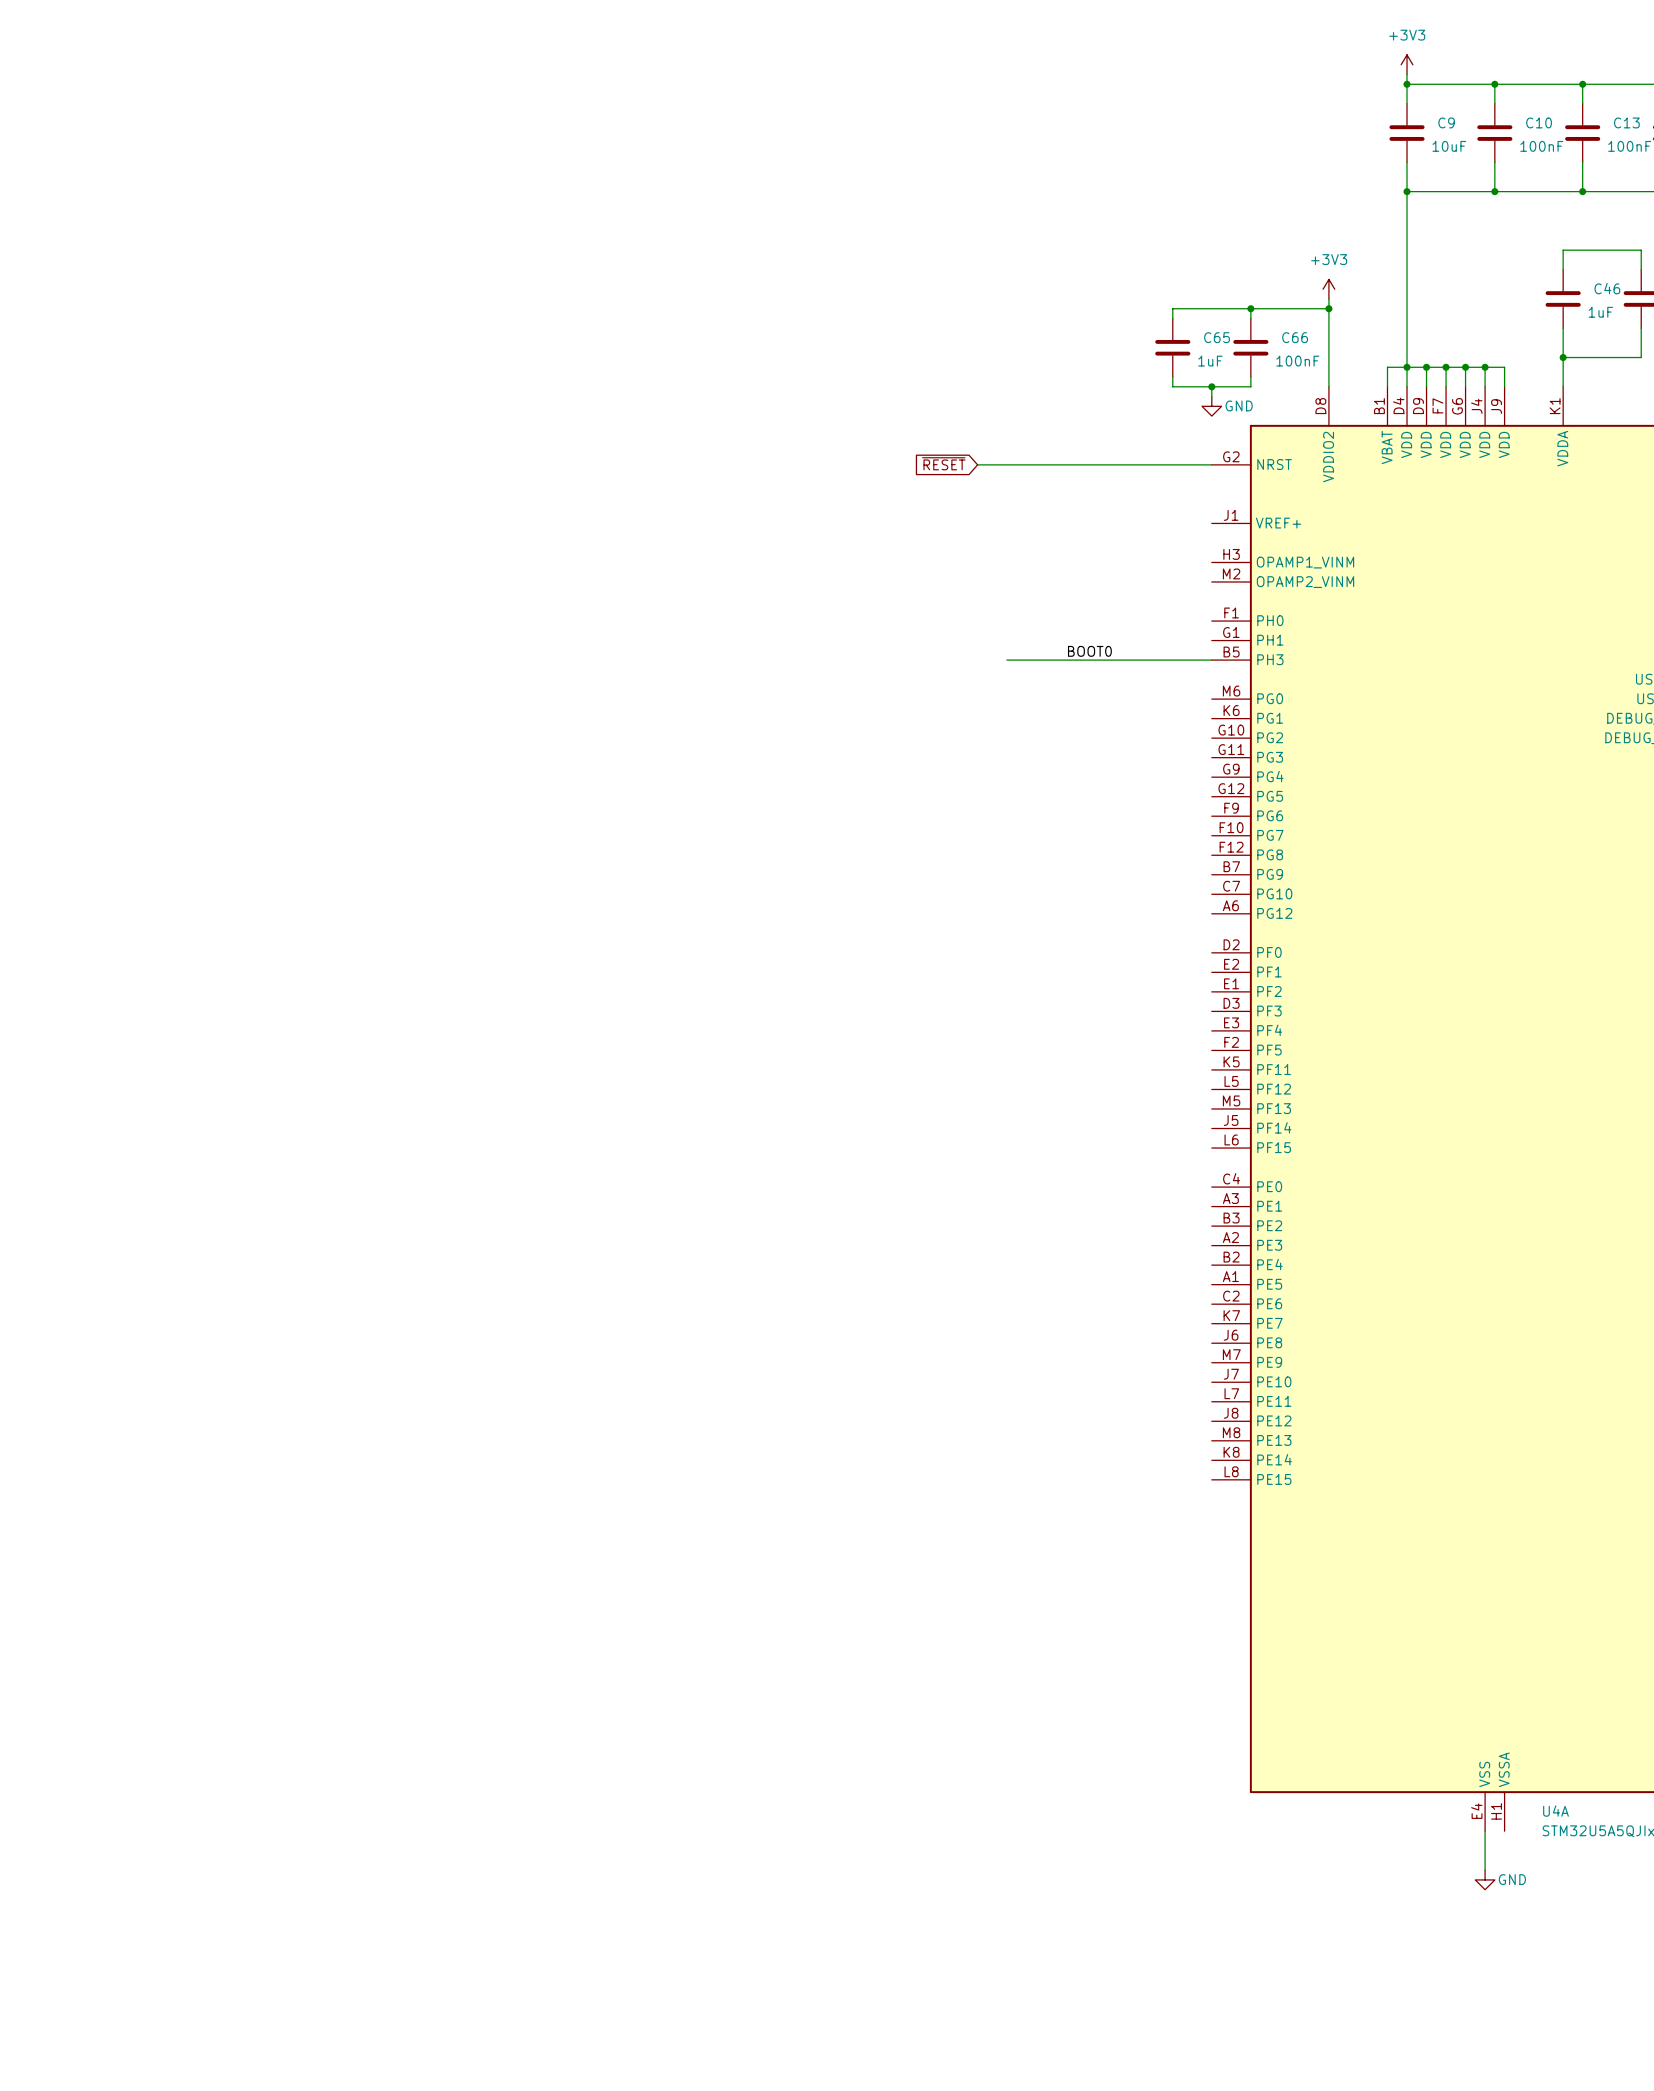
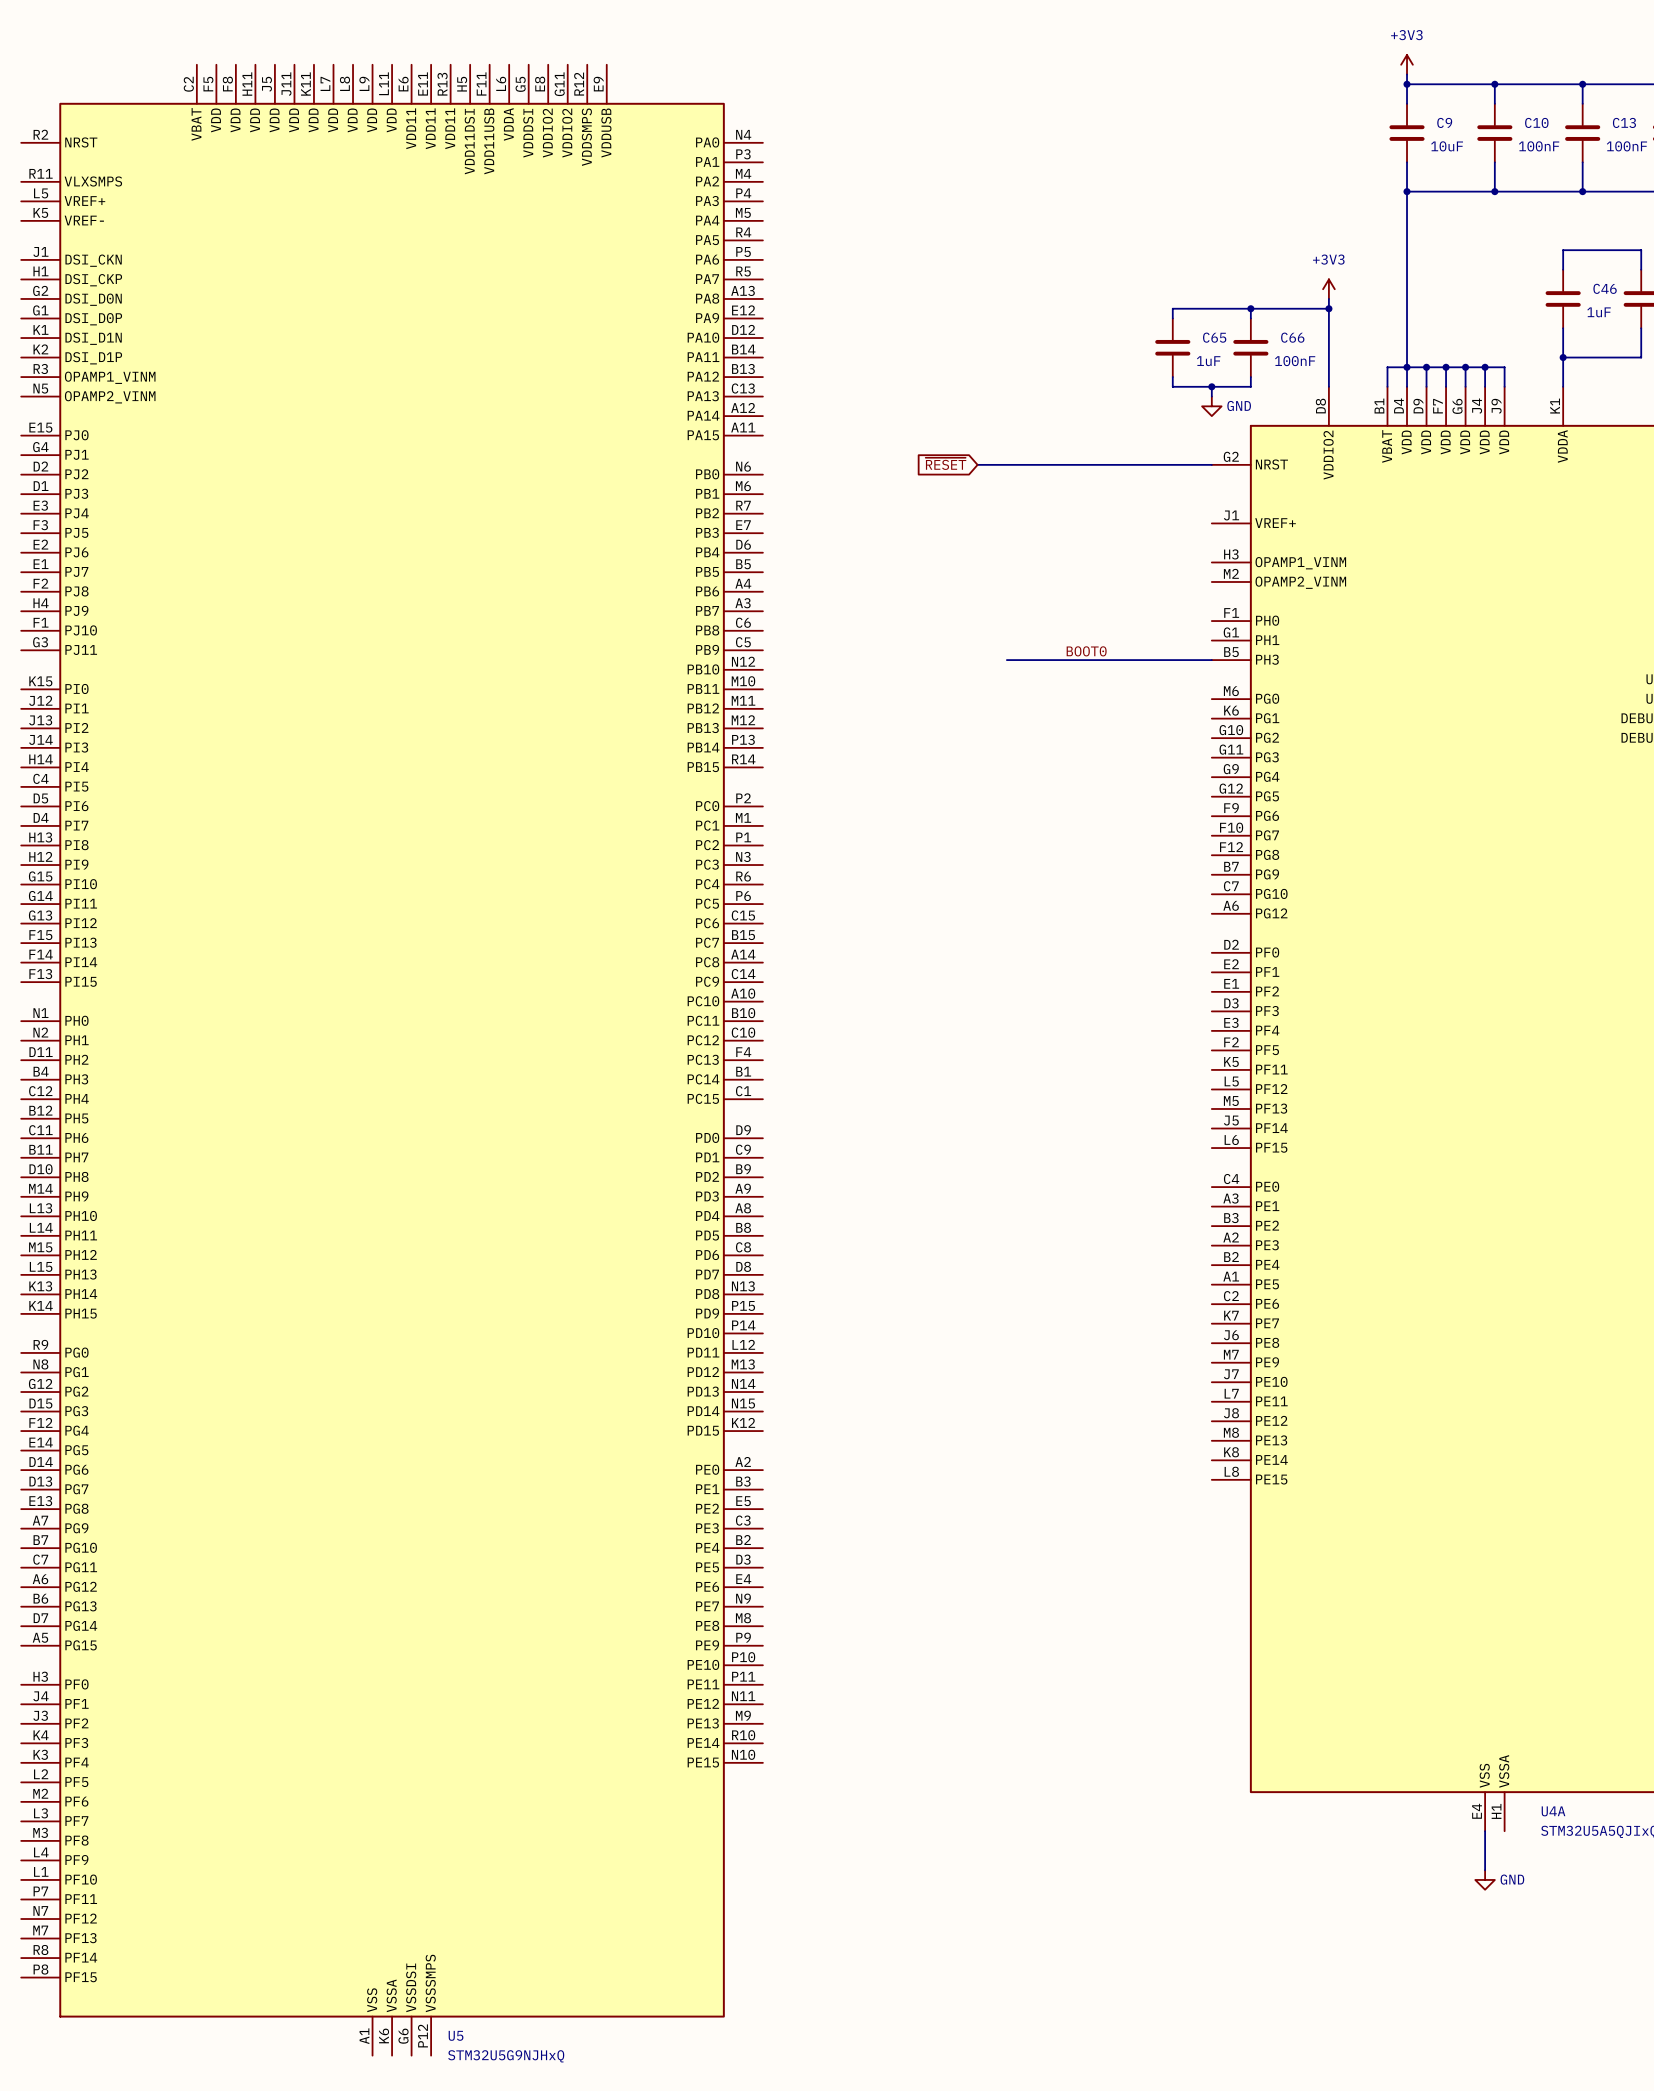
U5: none -> STM32U5G9NJHxQ (392, 1060)

